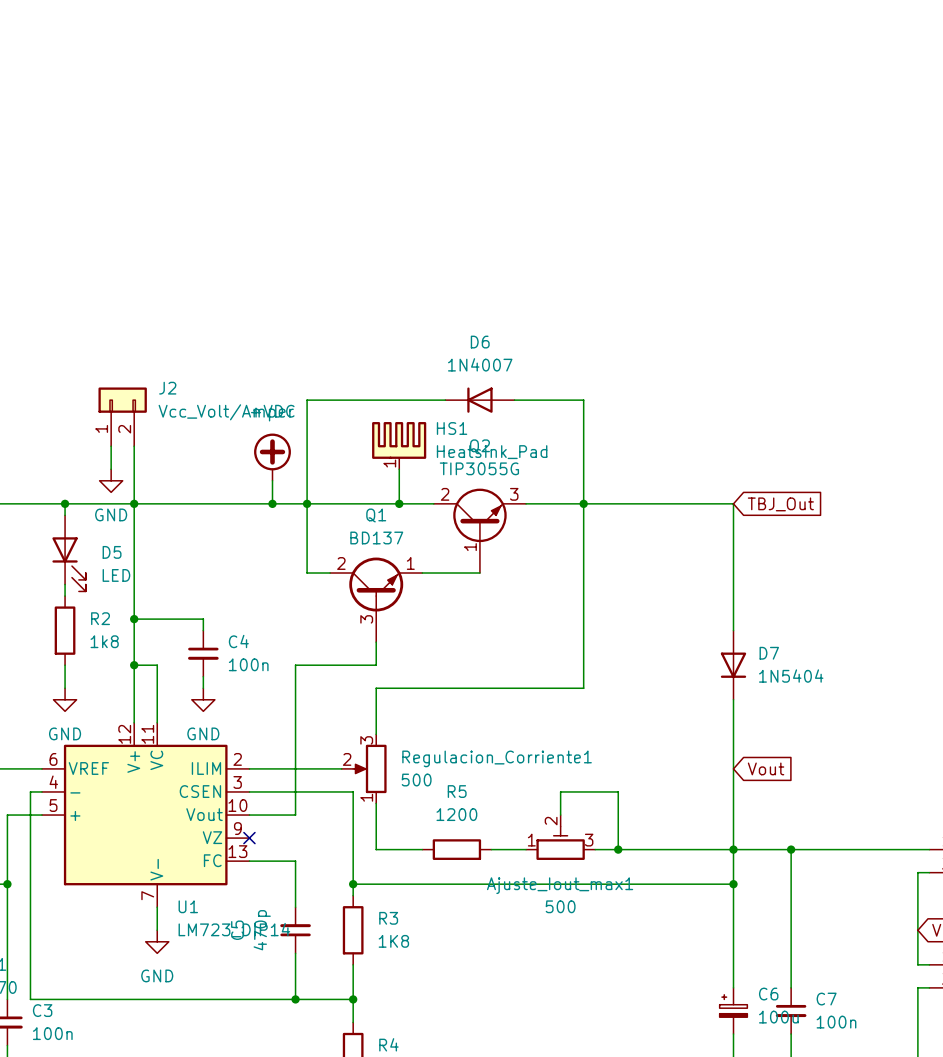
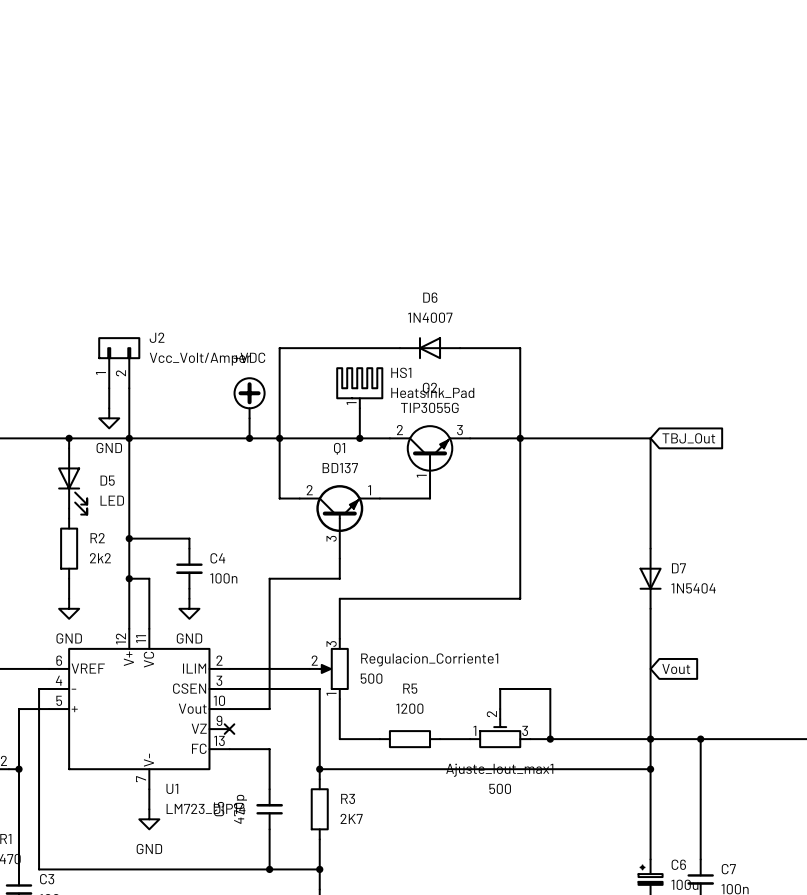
R2 value: 1k8 (104, 641) -> 2k2 (100, 558)
R3 value: 1K8 (393, 941) -> 2K7 (351, 818)

